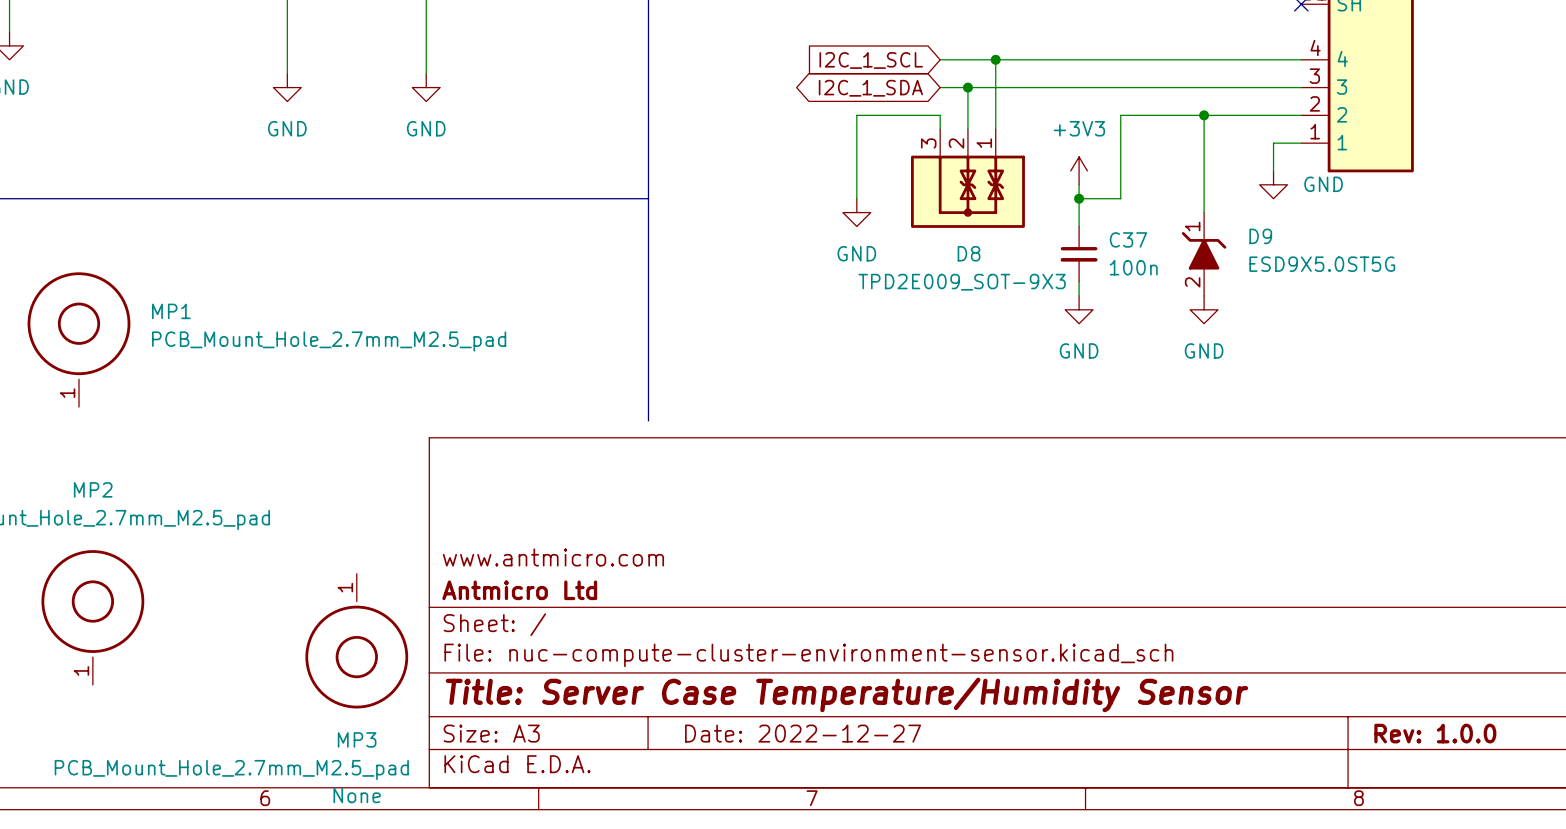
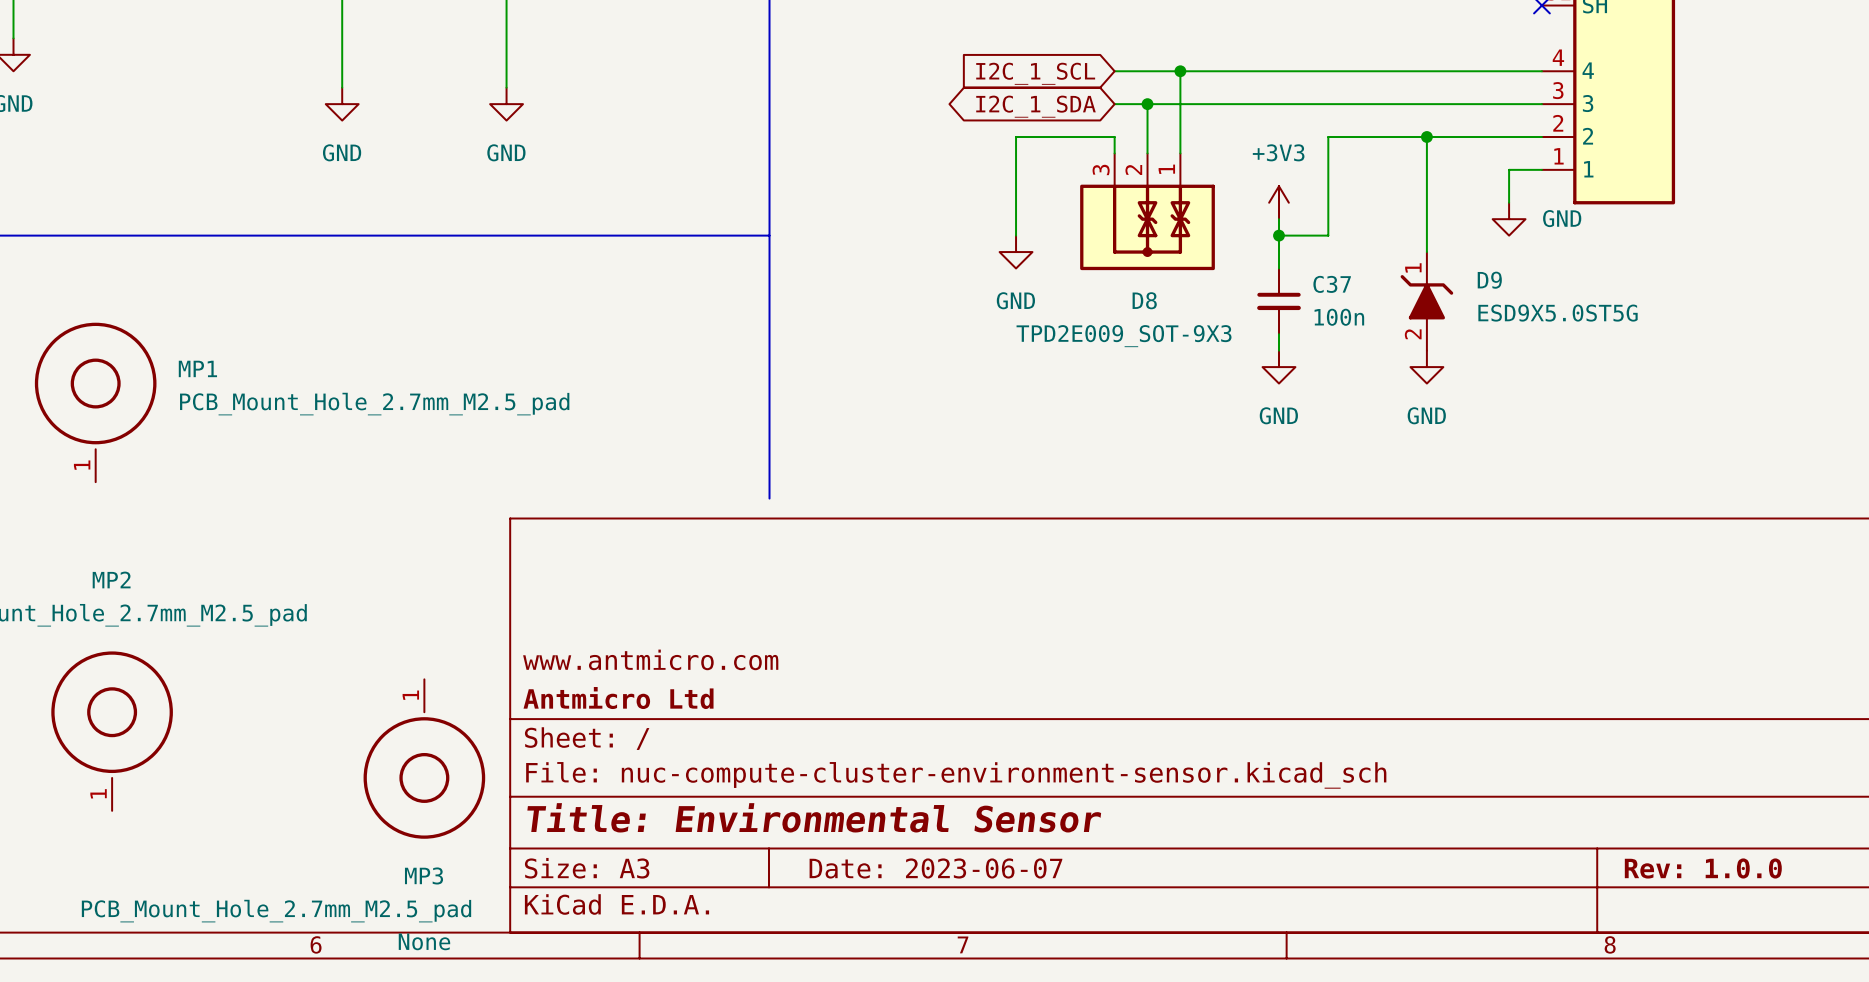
title block: Title: Server Case Temperature/Humidity Sensor (846, 694) -> Title: Environmental Sensor (814, 817)
title block: Date: 2022-12-27 (803, 733) -> Date: 2023-06-07 (935, 868)

